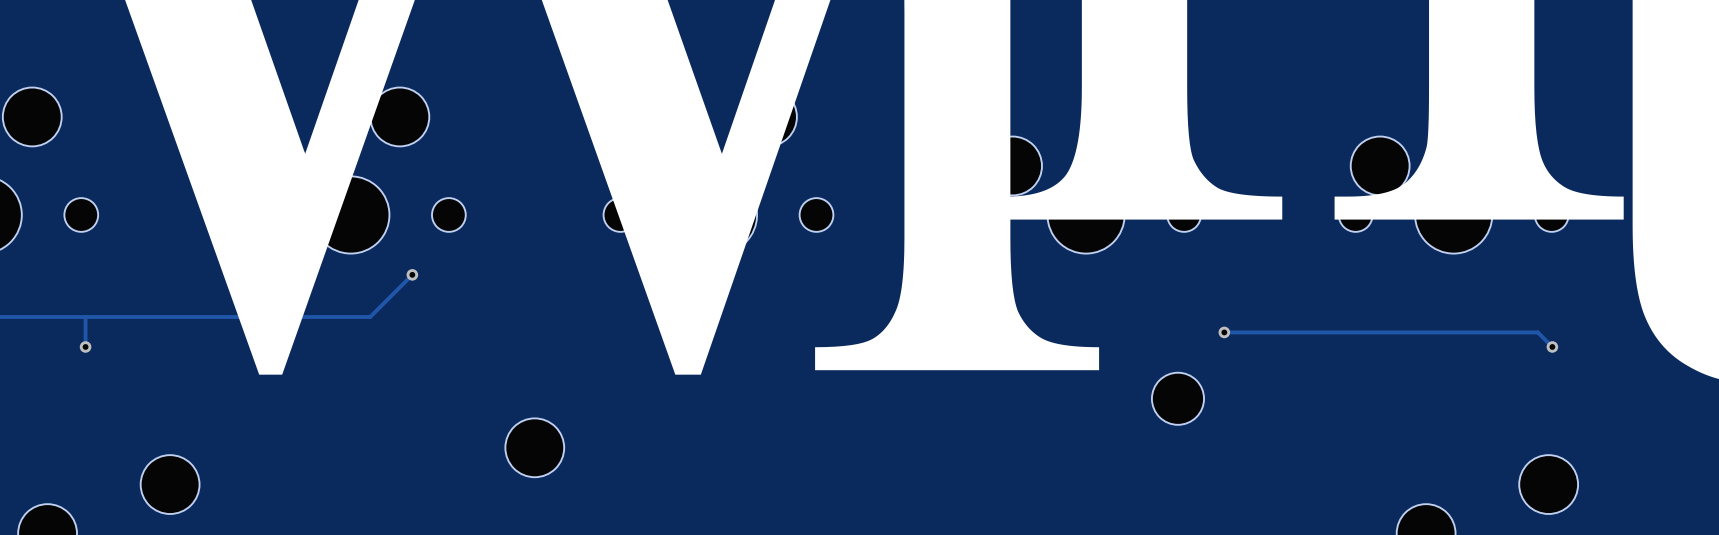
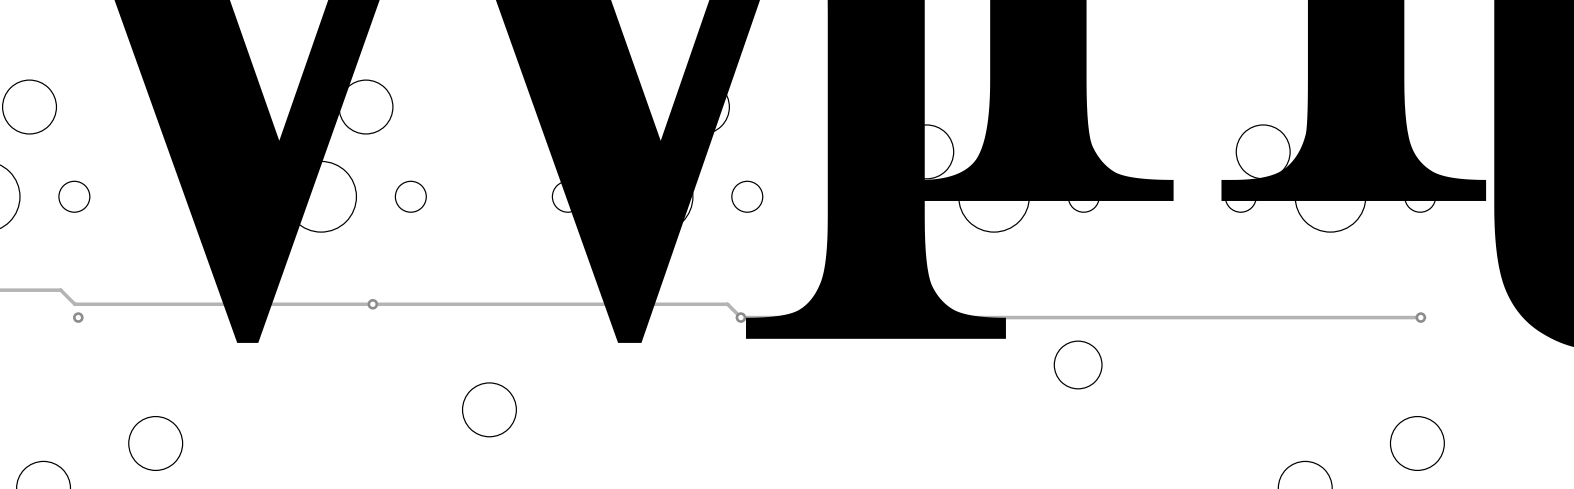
track: (412, 274) (370, 317) (66, 317) -> (1424, 317) (740, 317) (727, 304) (74, 304) (60, 290)
via position: (412, 274) -> (372, 304)
track: (85, 317) (85, 346) -> none
track: (1224, 332) (1537, 332) (1552, 346) -> none
via: (1224, 332) -> none
via: none -> (740, 317)

